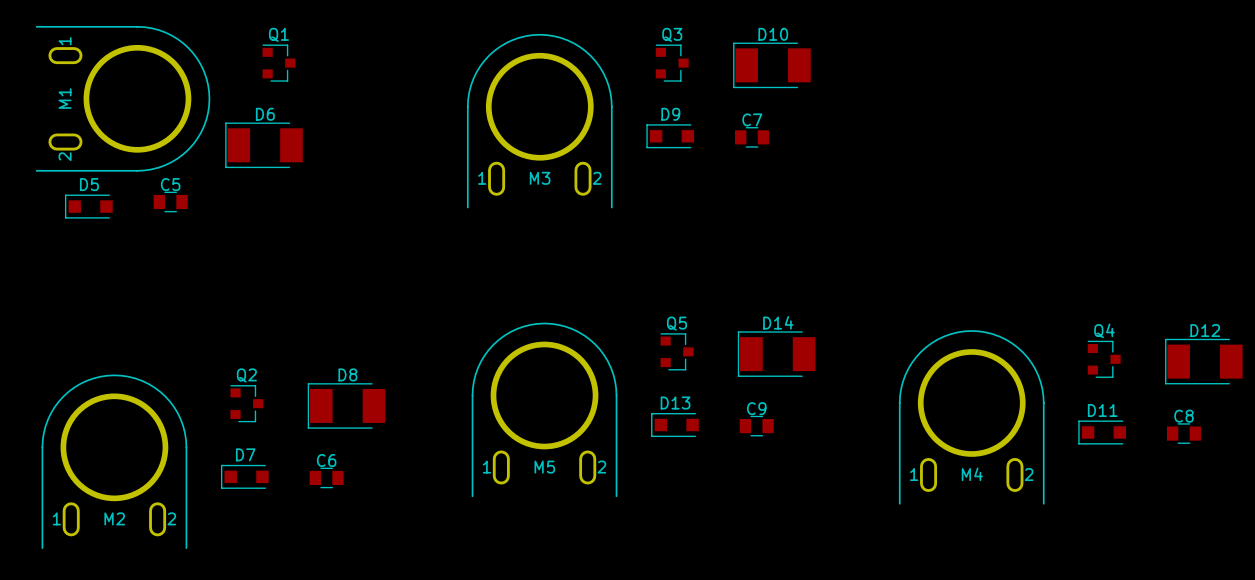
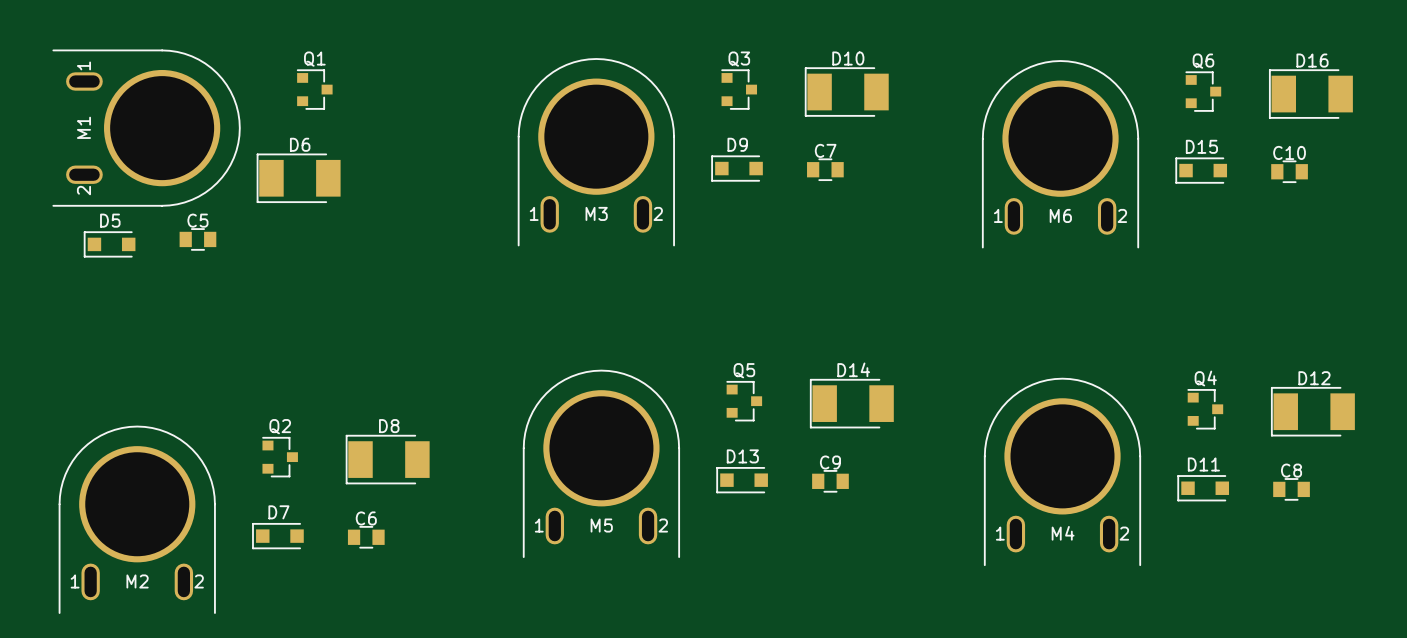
Q6: none -> (1203, 91)
D16: none -> (1311, 94)
M6: none -> (1060, 154)
D15: none -> (1201, 170)
C10: none -> (1289, 171)

